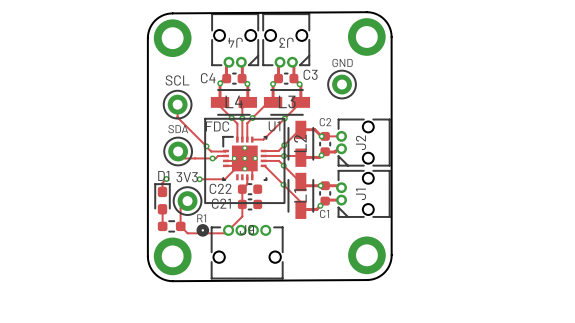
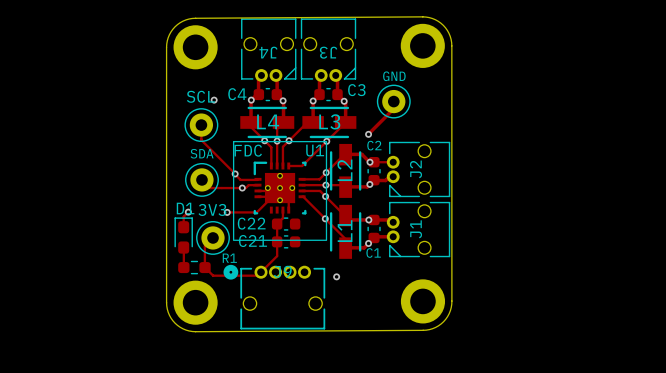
via: none -> (214, 100)
track: none -> (393, 101) (393, 108) (368, 134)
via: none -> (368, 134)
via: none -> (336, 276)

